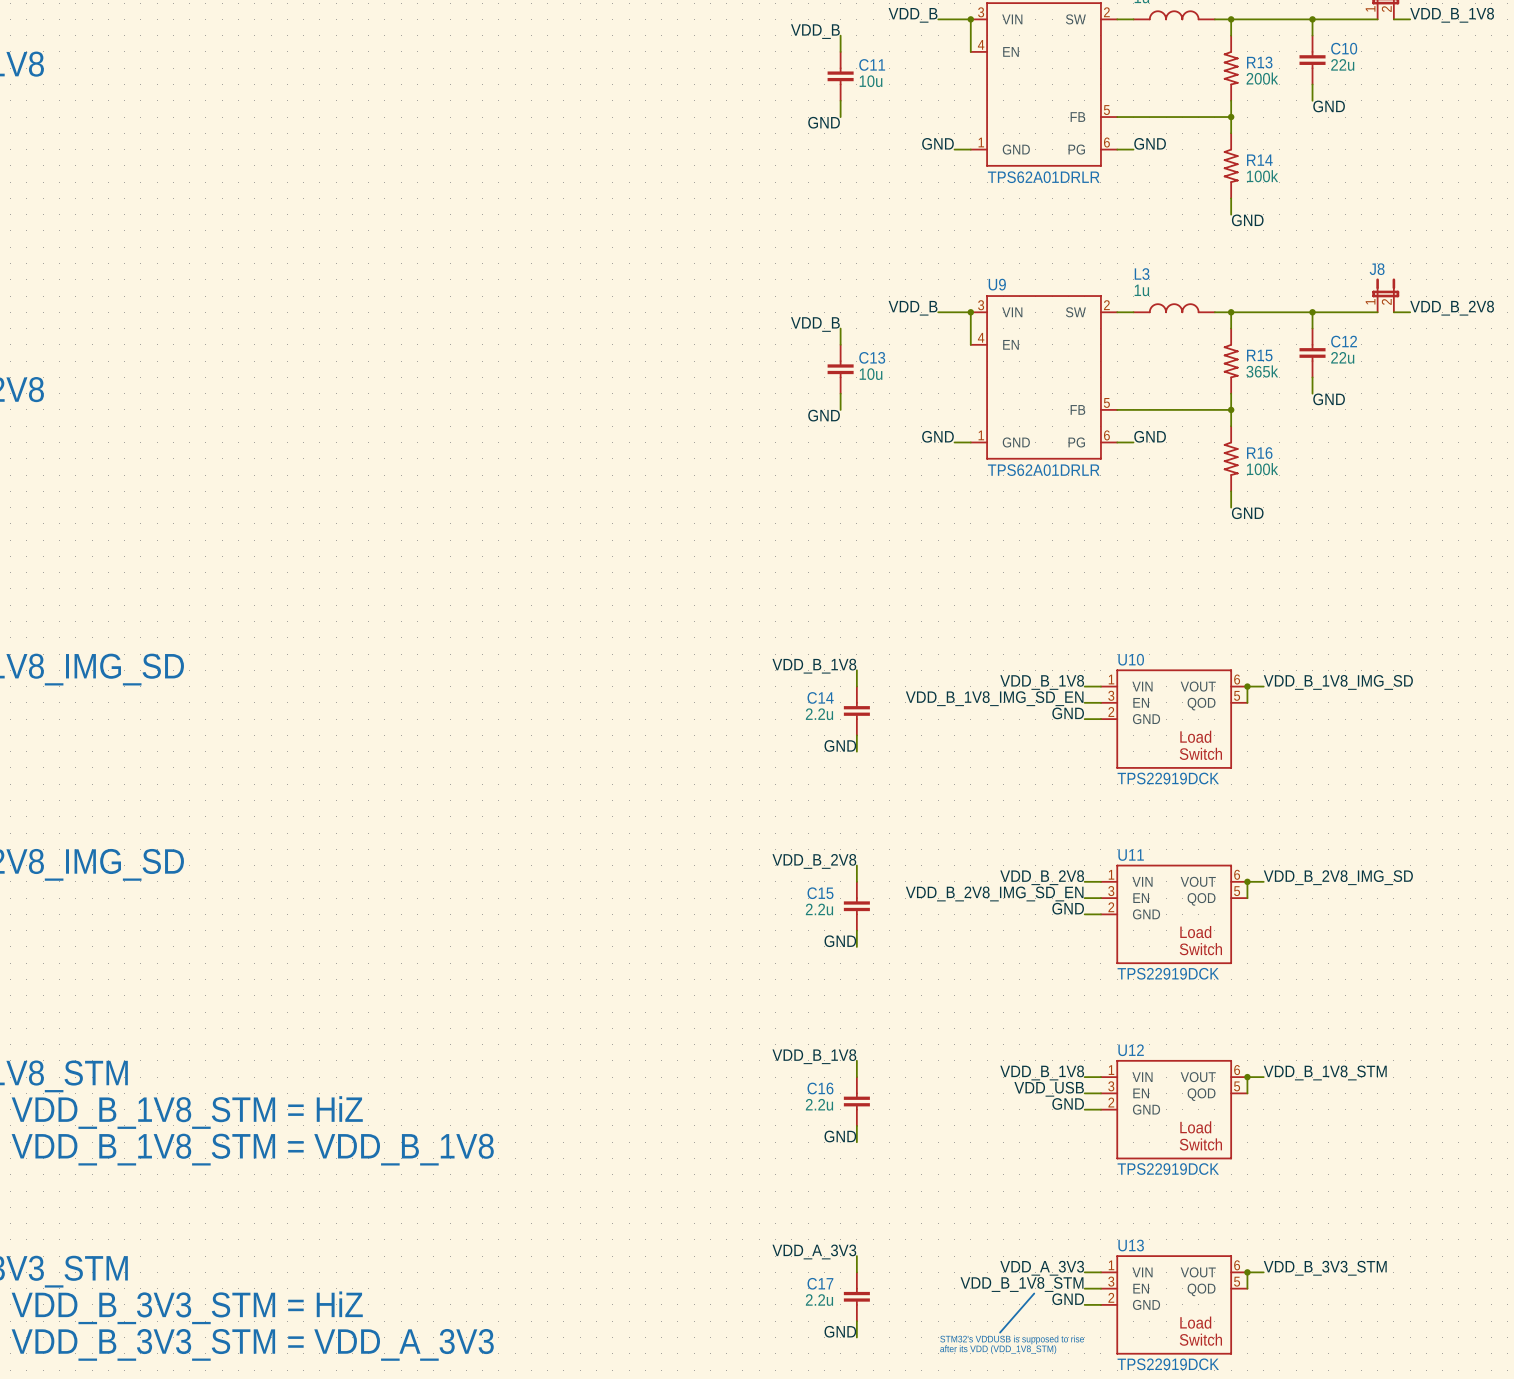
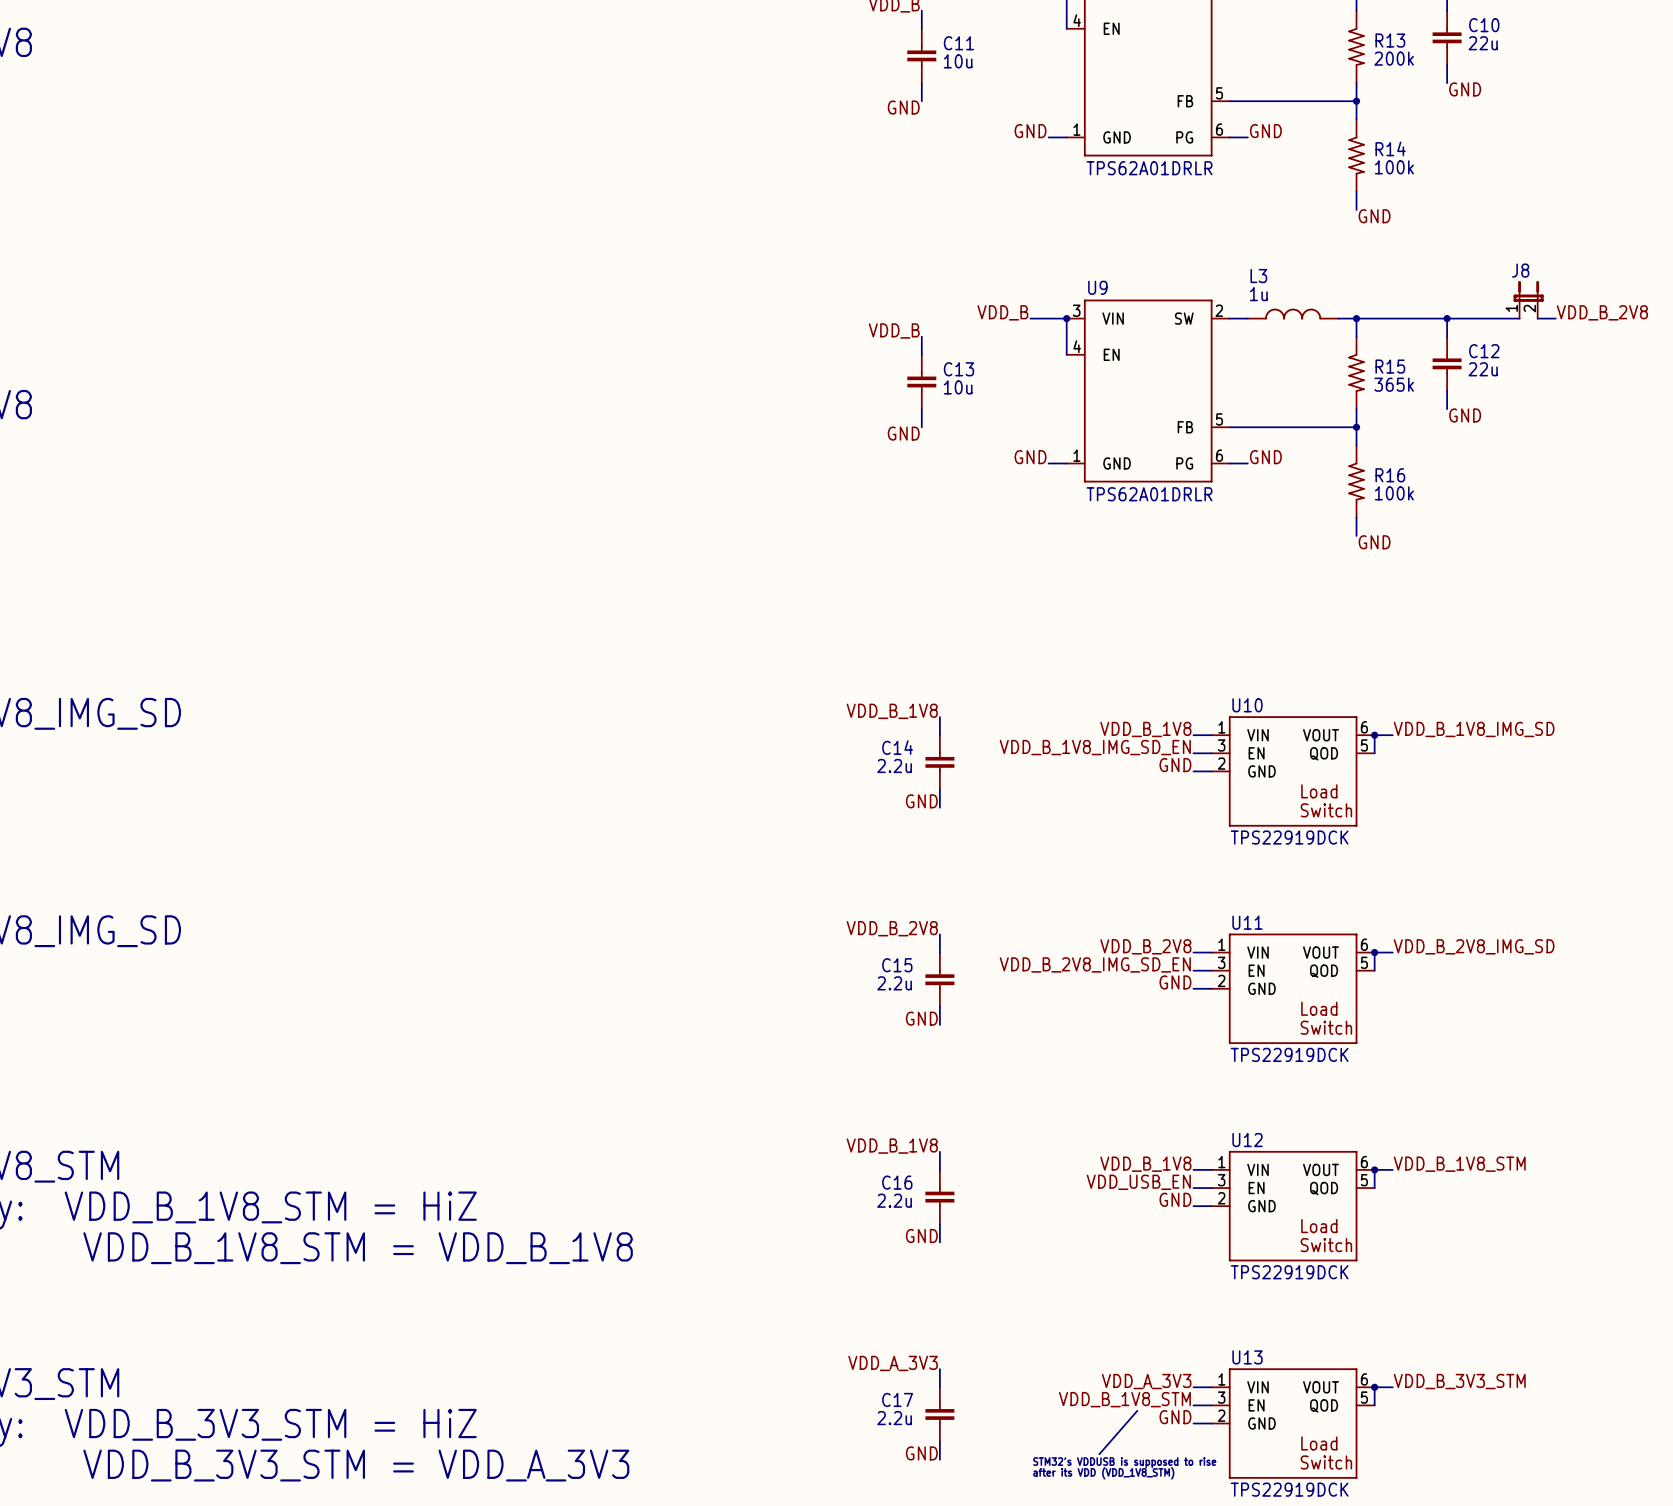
label: VDD_USB (1049, 1089) -> VDD_USB_EN (1138, 1182)

